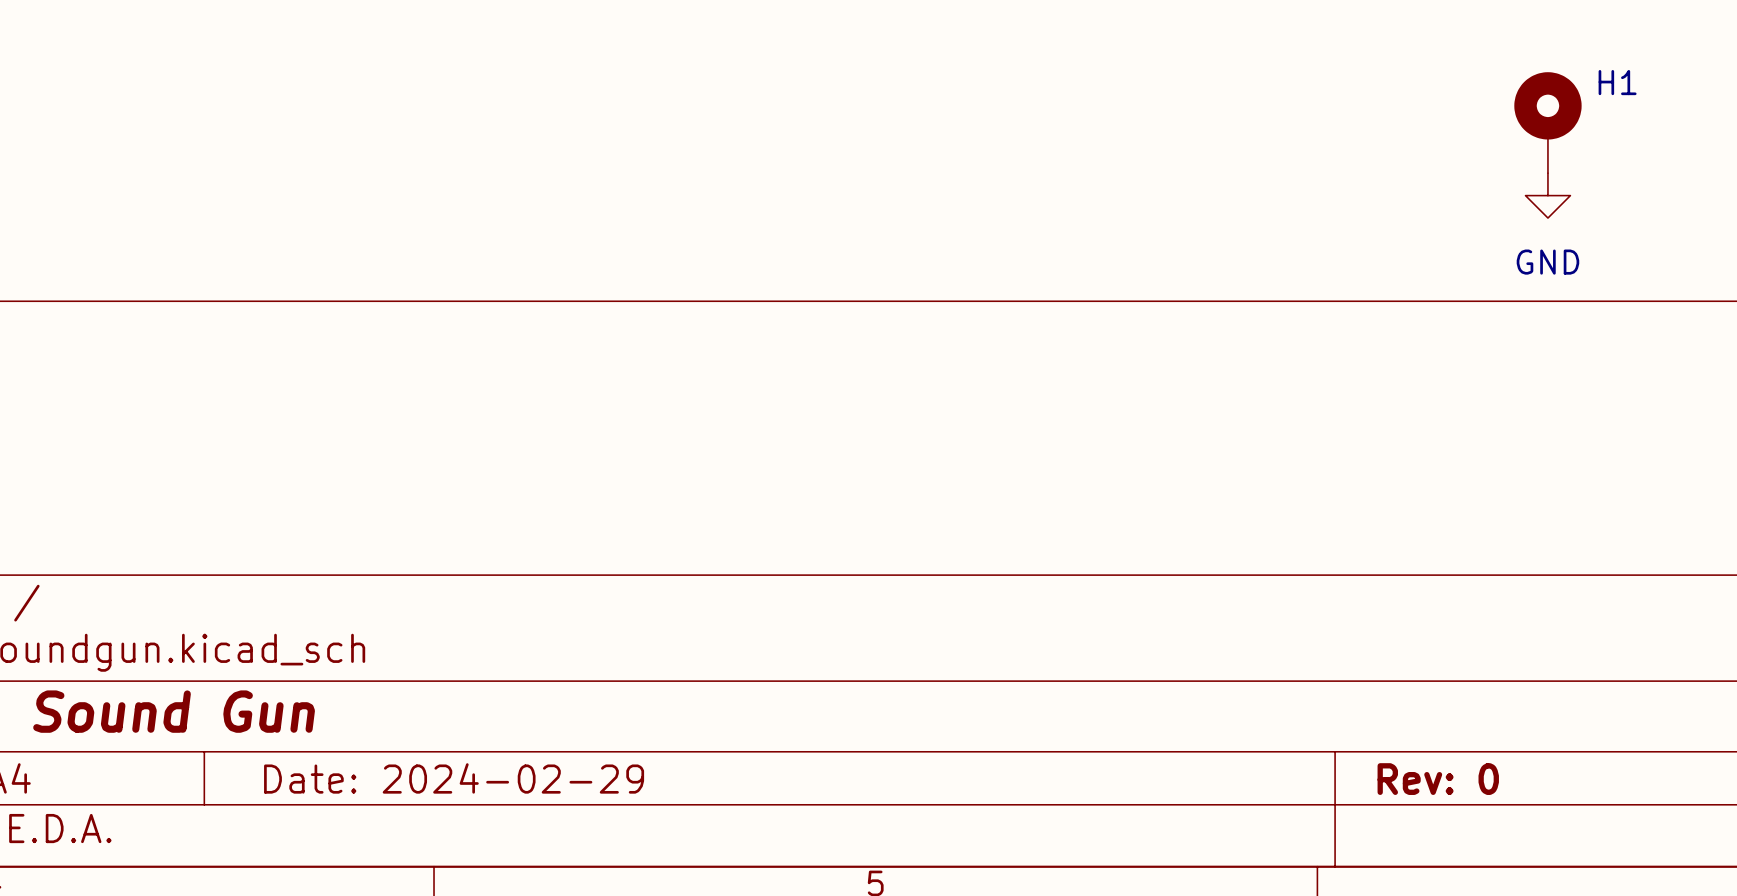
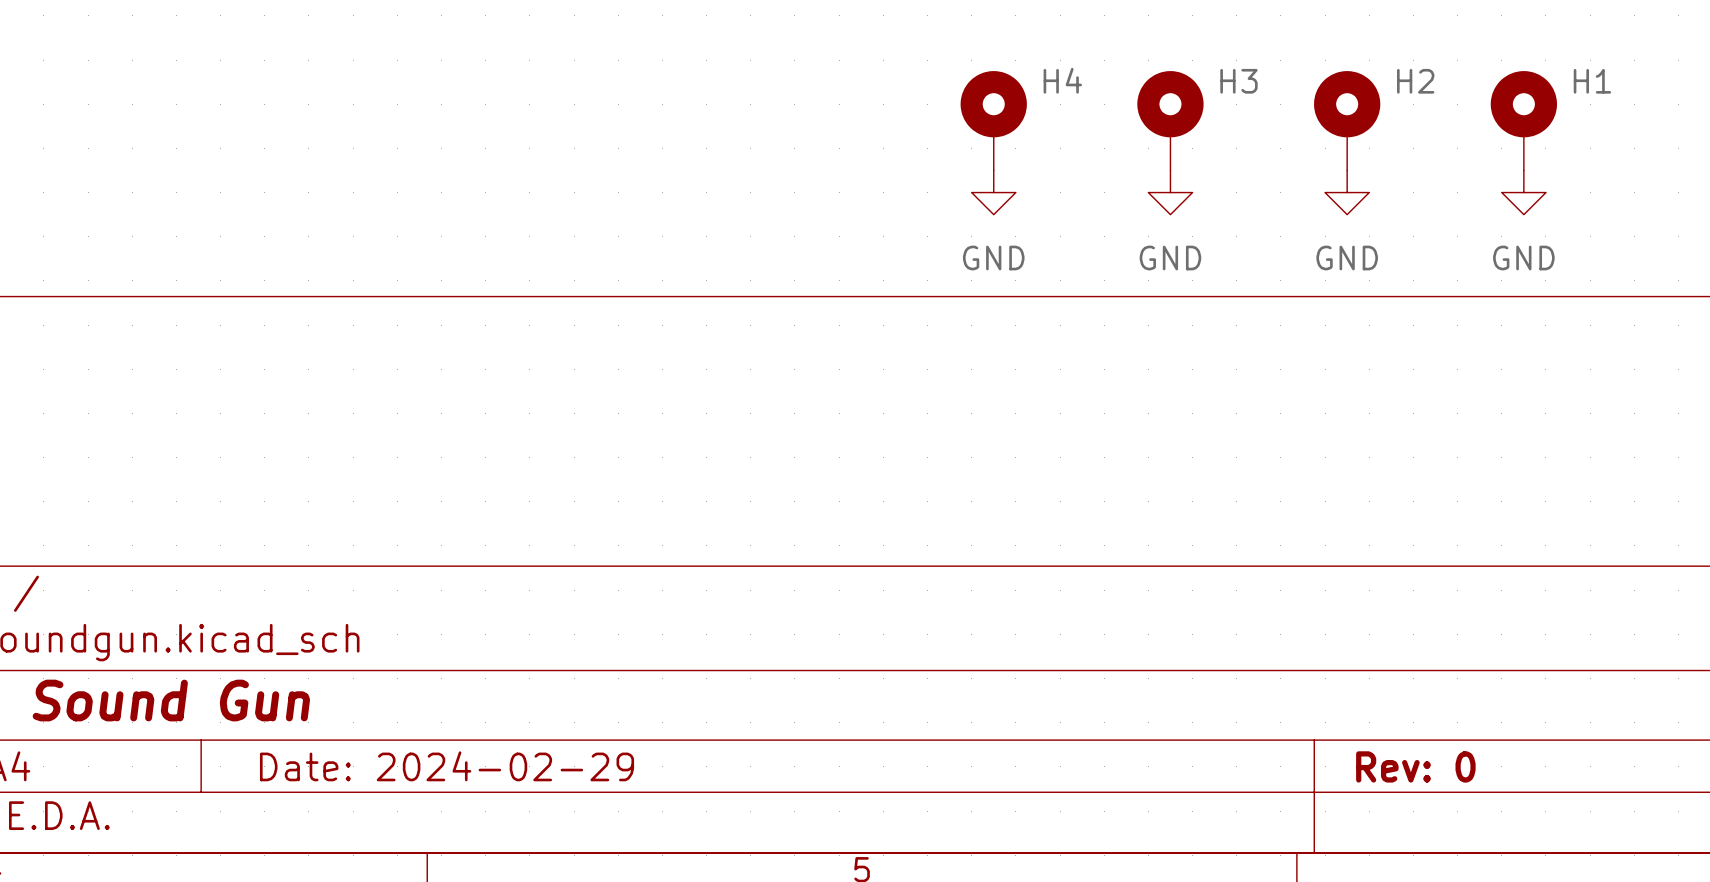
H4: none -> (993, 120)
H3: none -> (1170, 120)
H2: none -> (1347, 120)
power symbol: none -> GND (993, 192)
power symbol: none -> GND (1170, 192)
power symbol: none -> GND (1347, 192)

